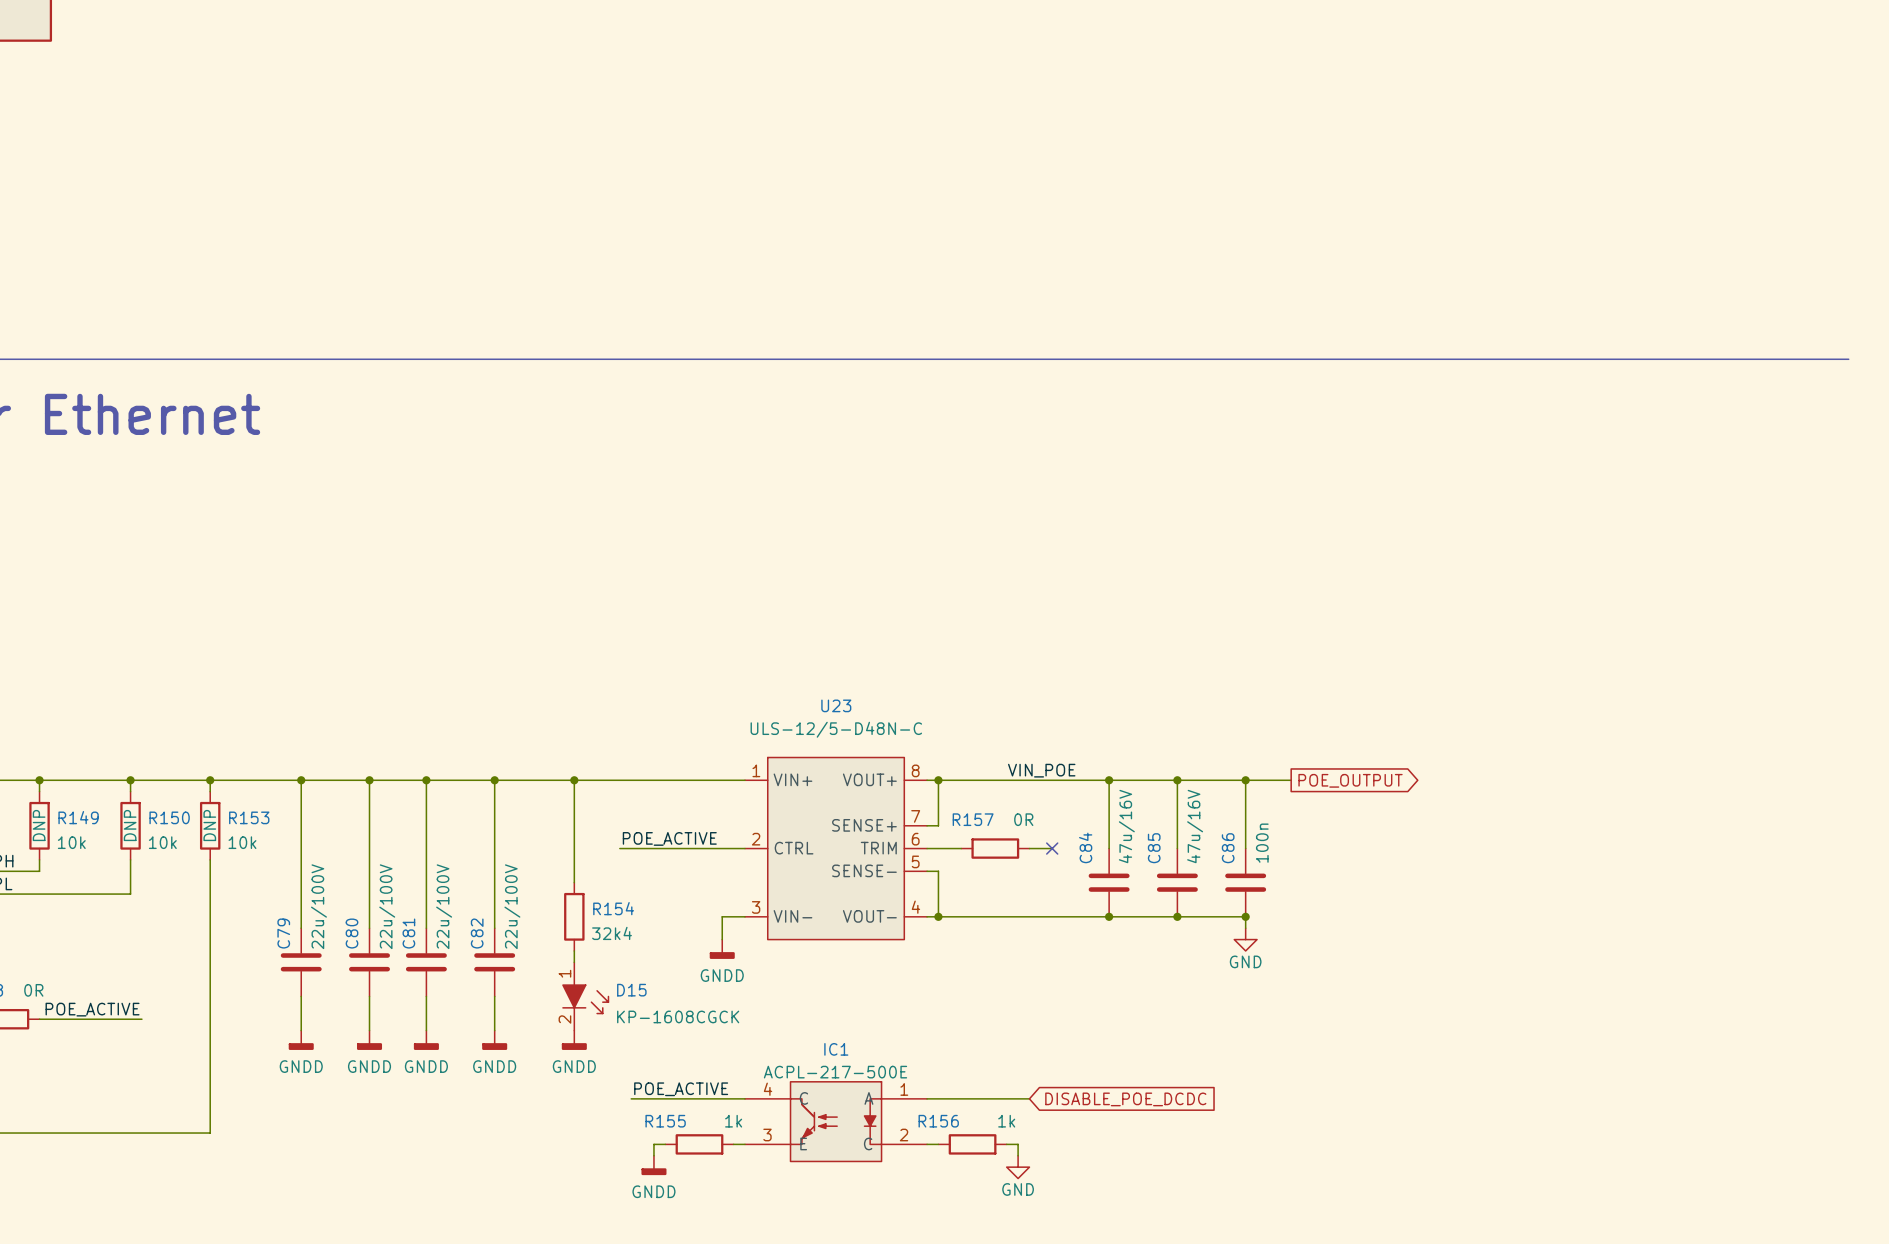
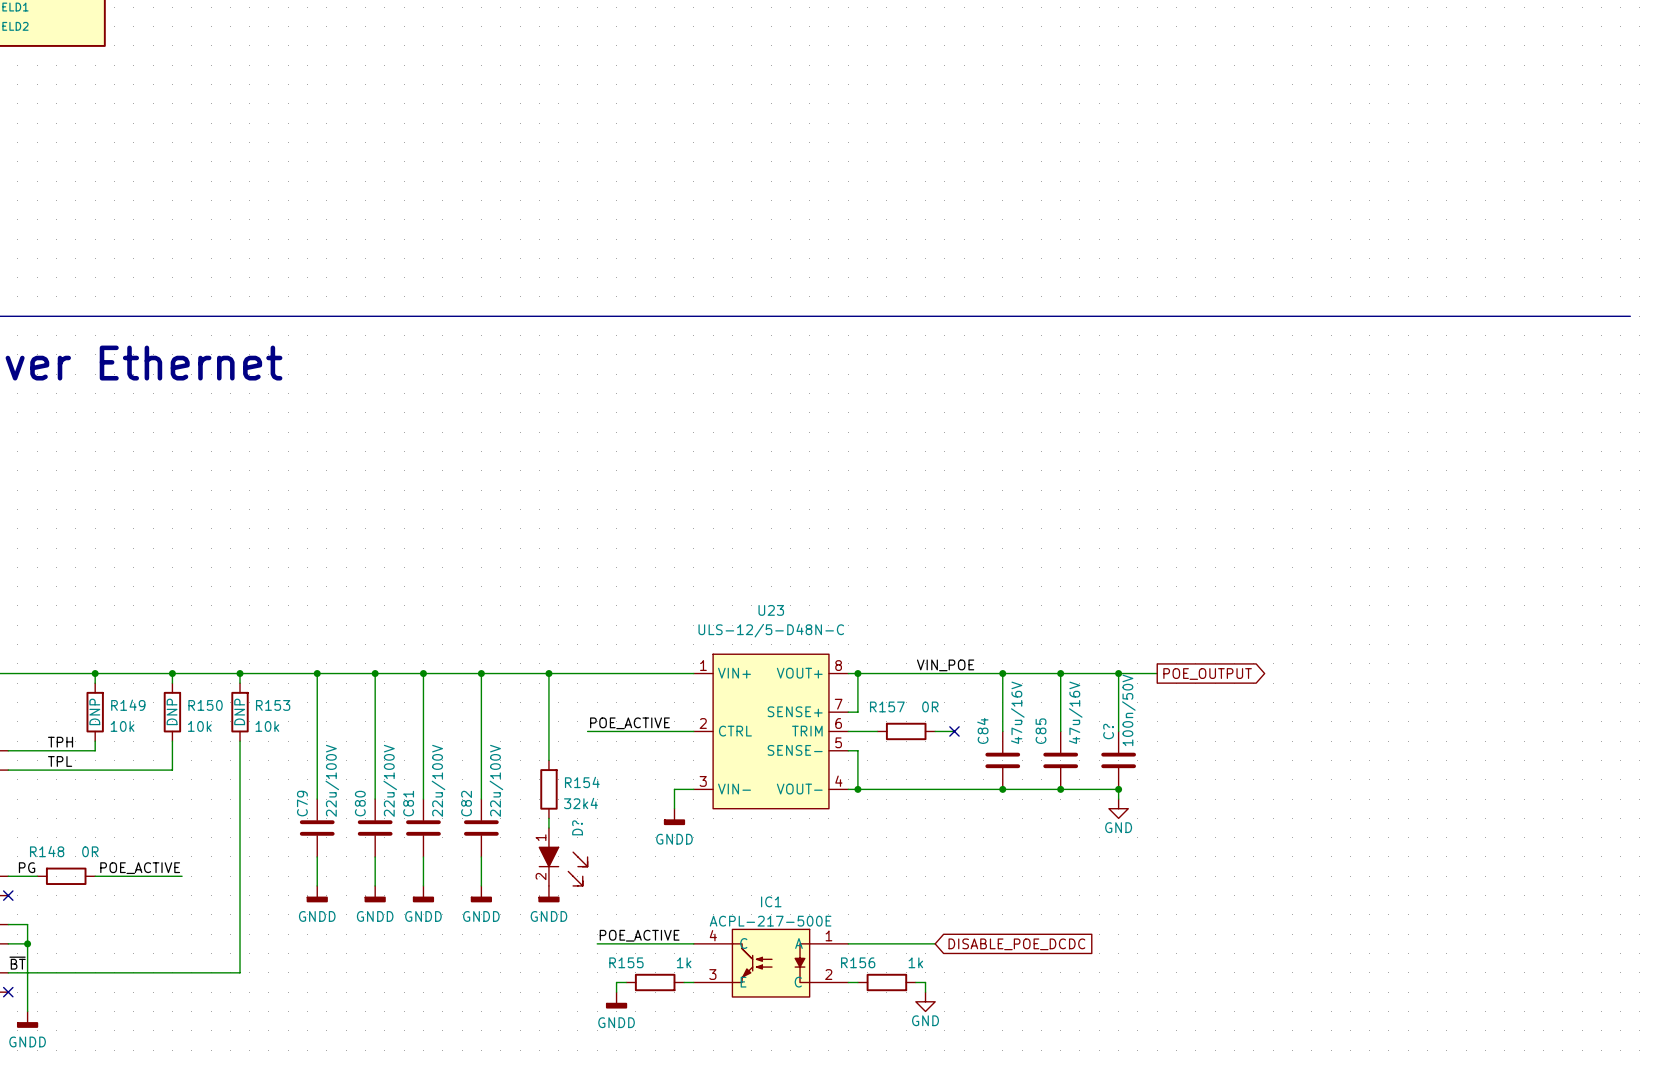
C86 text: 100n (1262, 843) -> 100n/50V (1128, 710)
C86 name: C86 (1228, 848) -> C? (1108, 731)
D15: KP-1608CGCK (585, 996) -> none
D?: none -> (563, 856)

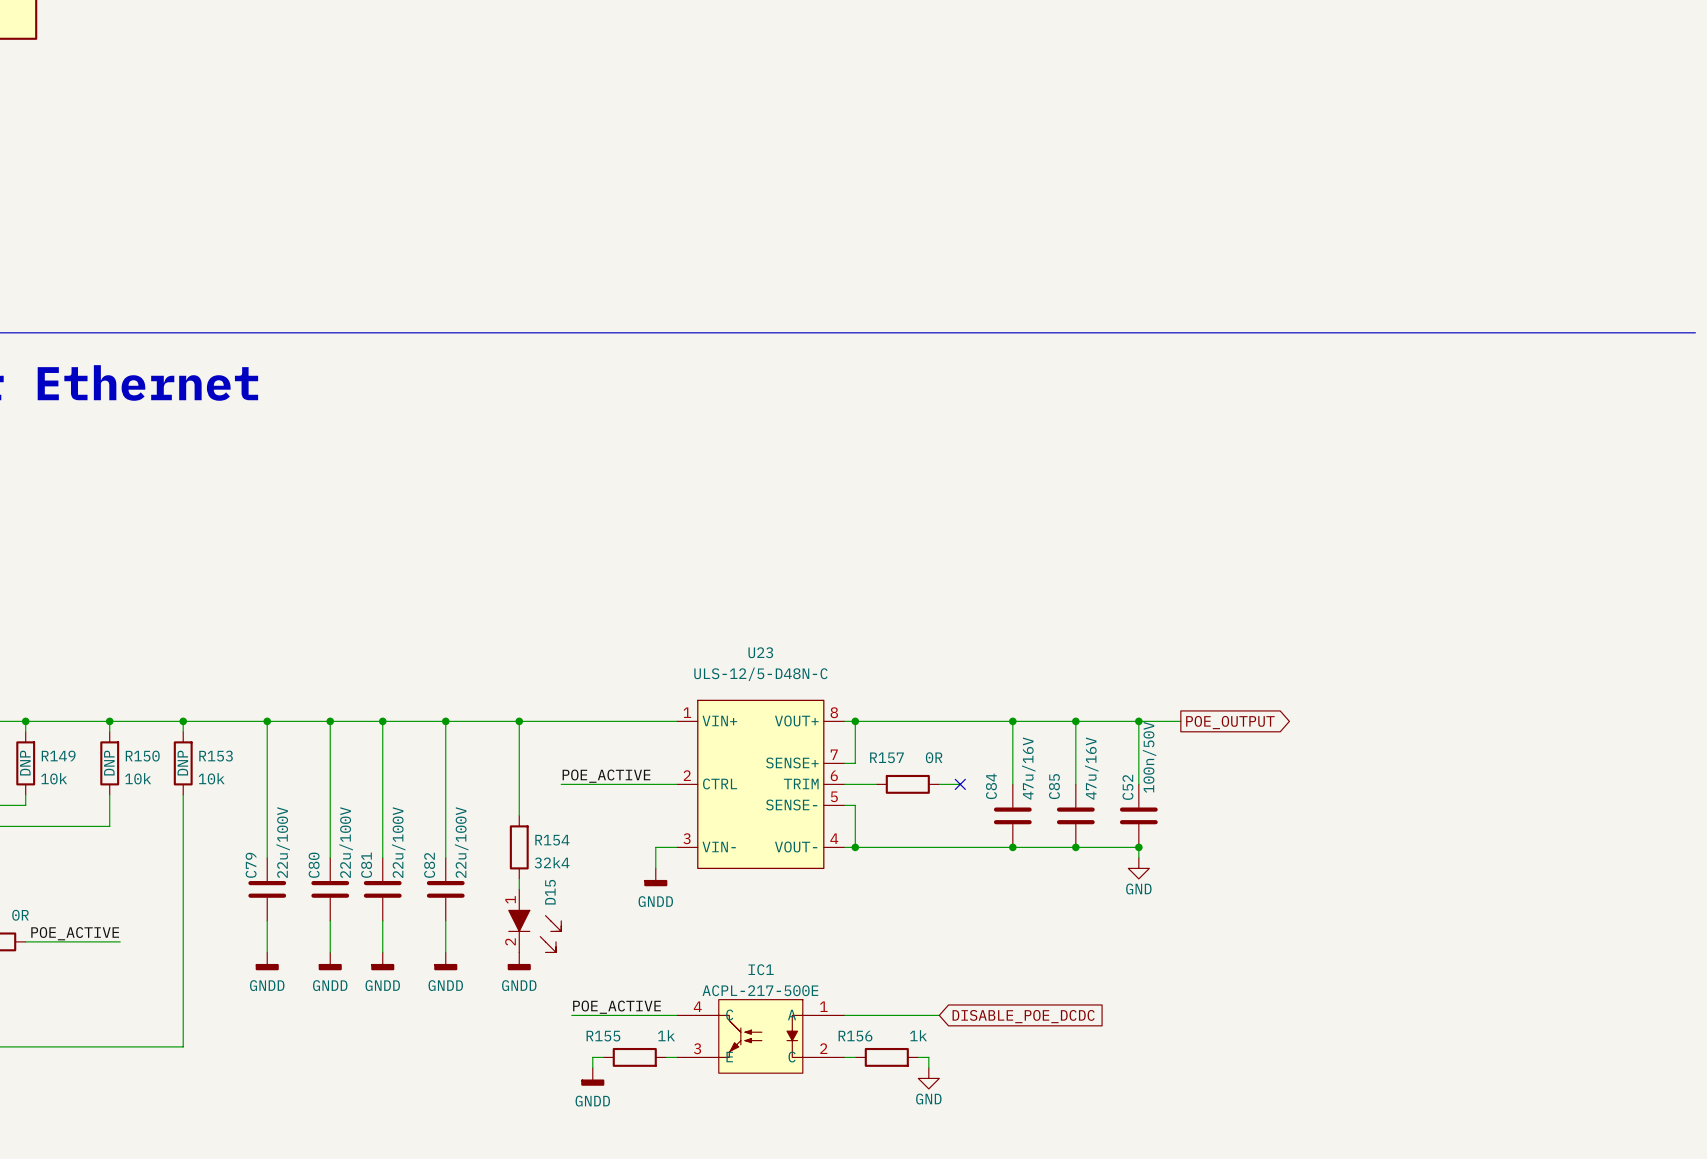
label: VIN_POE (945, 665) -> none
C? name: C? (1108, 731) -> C52 (1127, 787)
D? name: D? (577, 827) -> D15 (550, 892)

